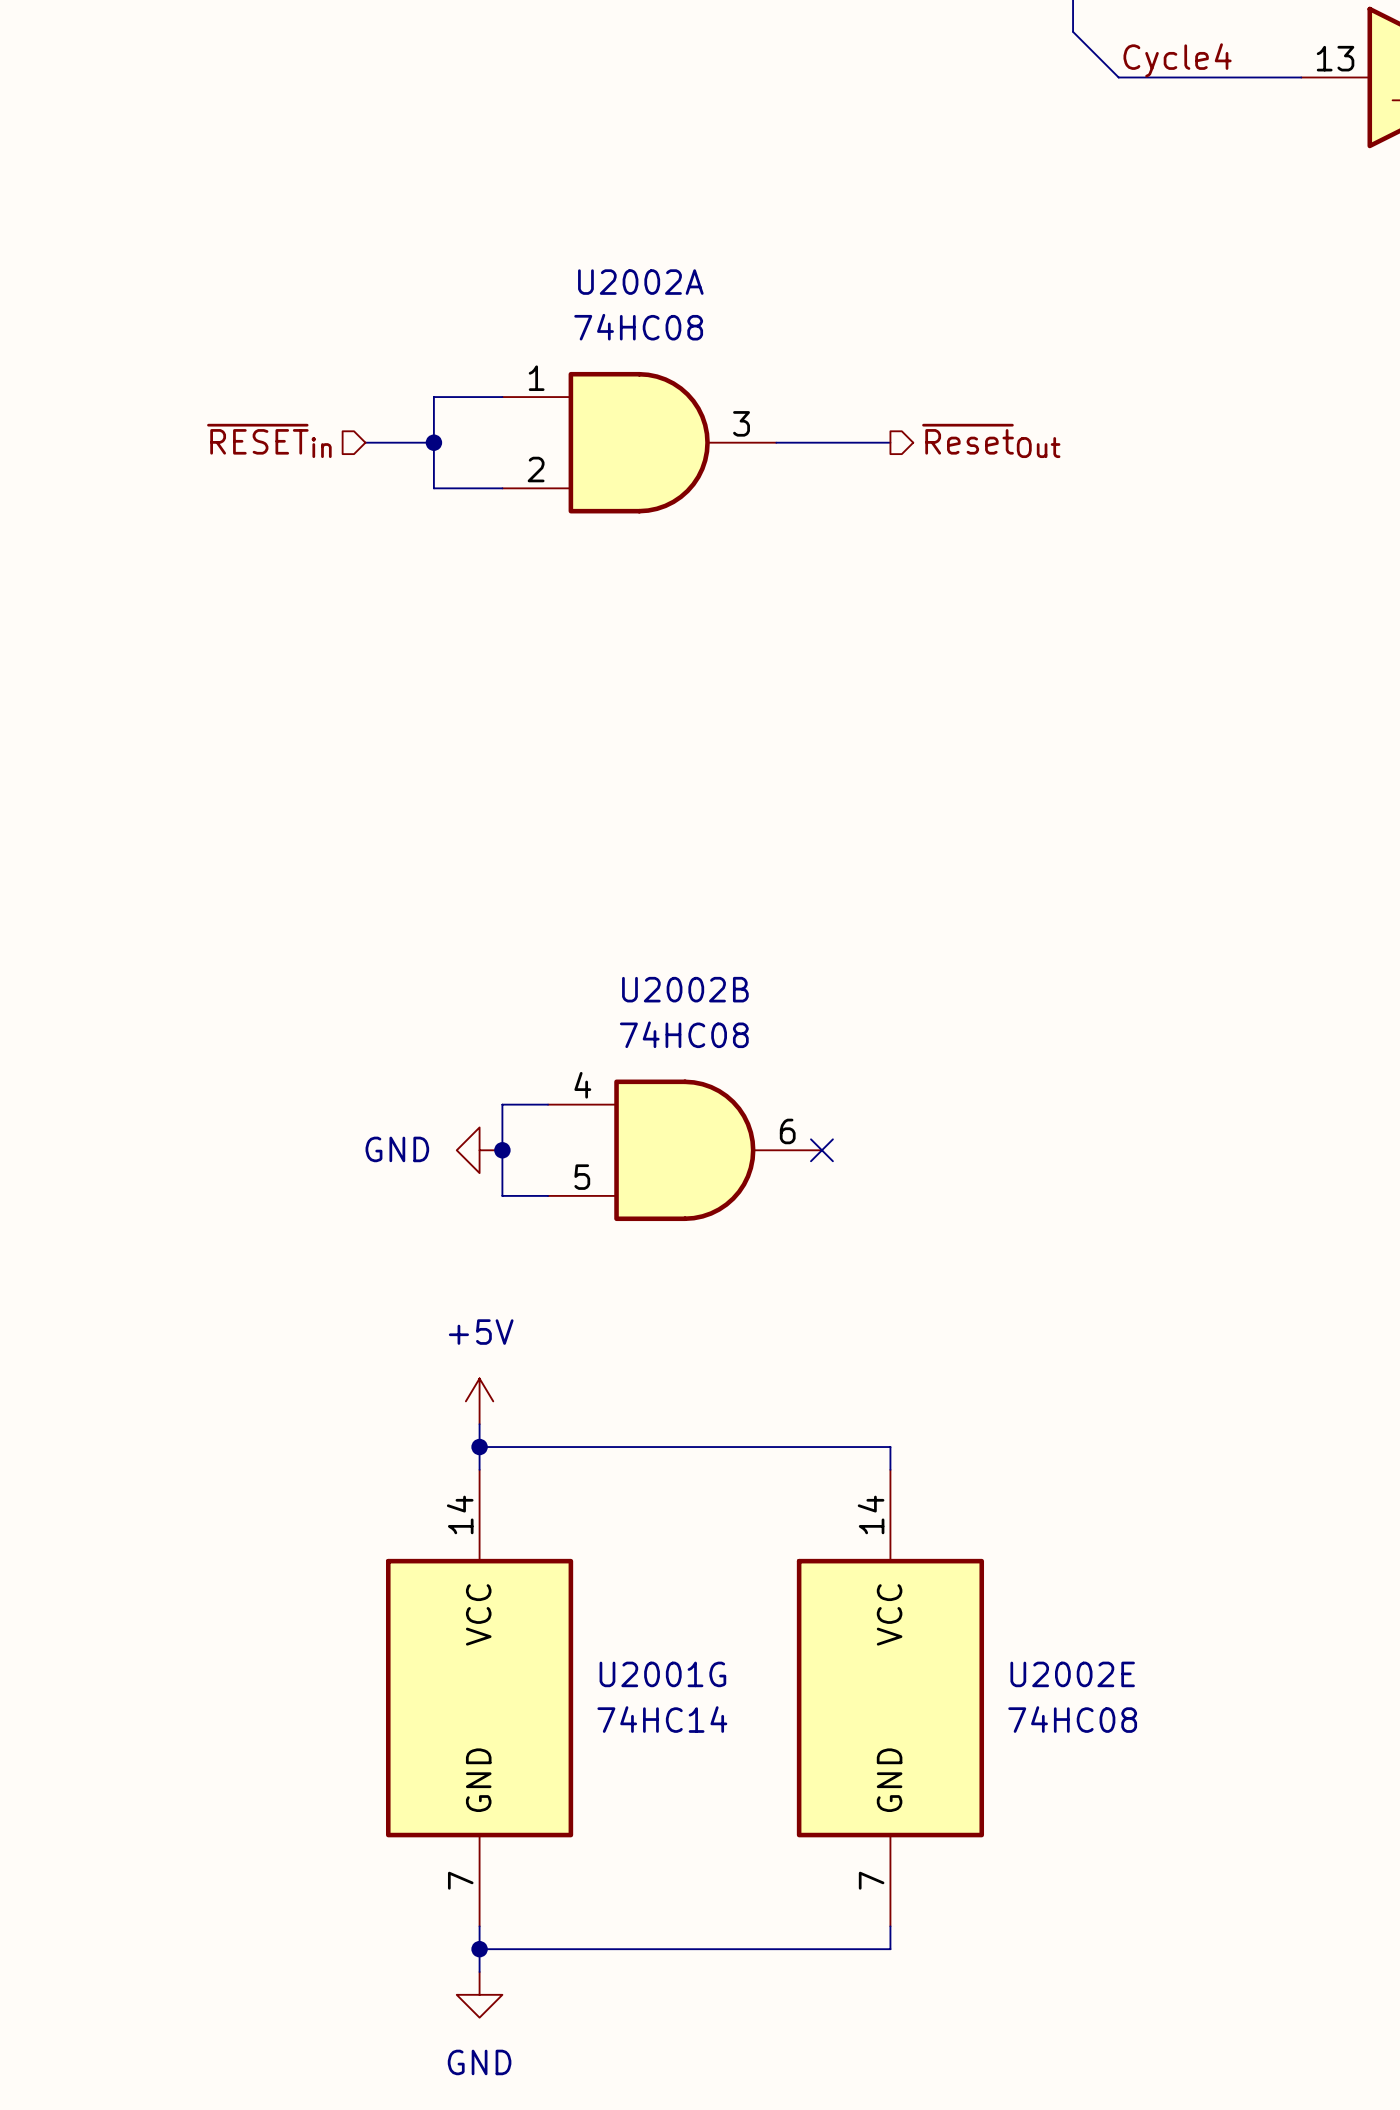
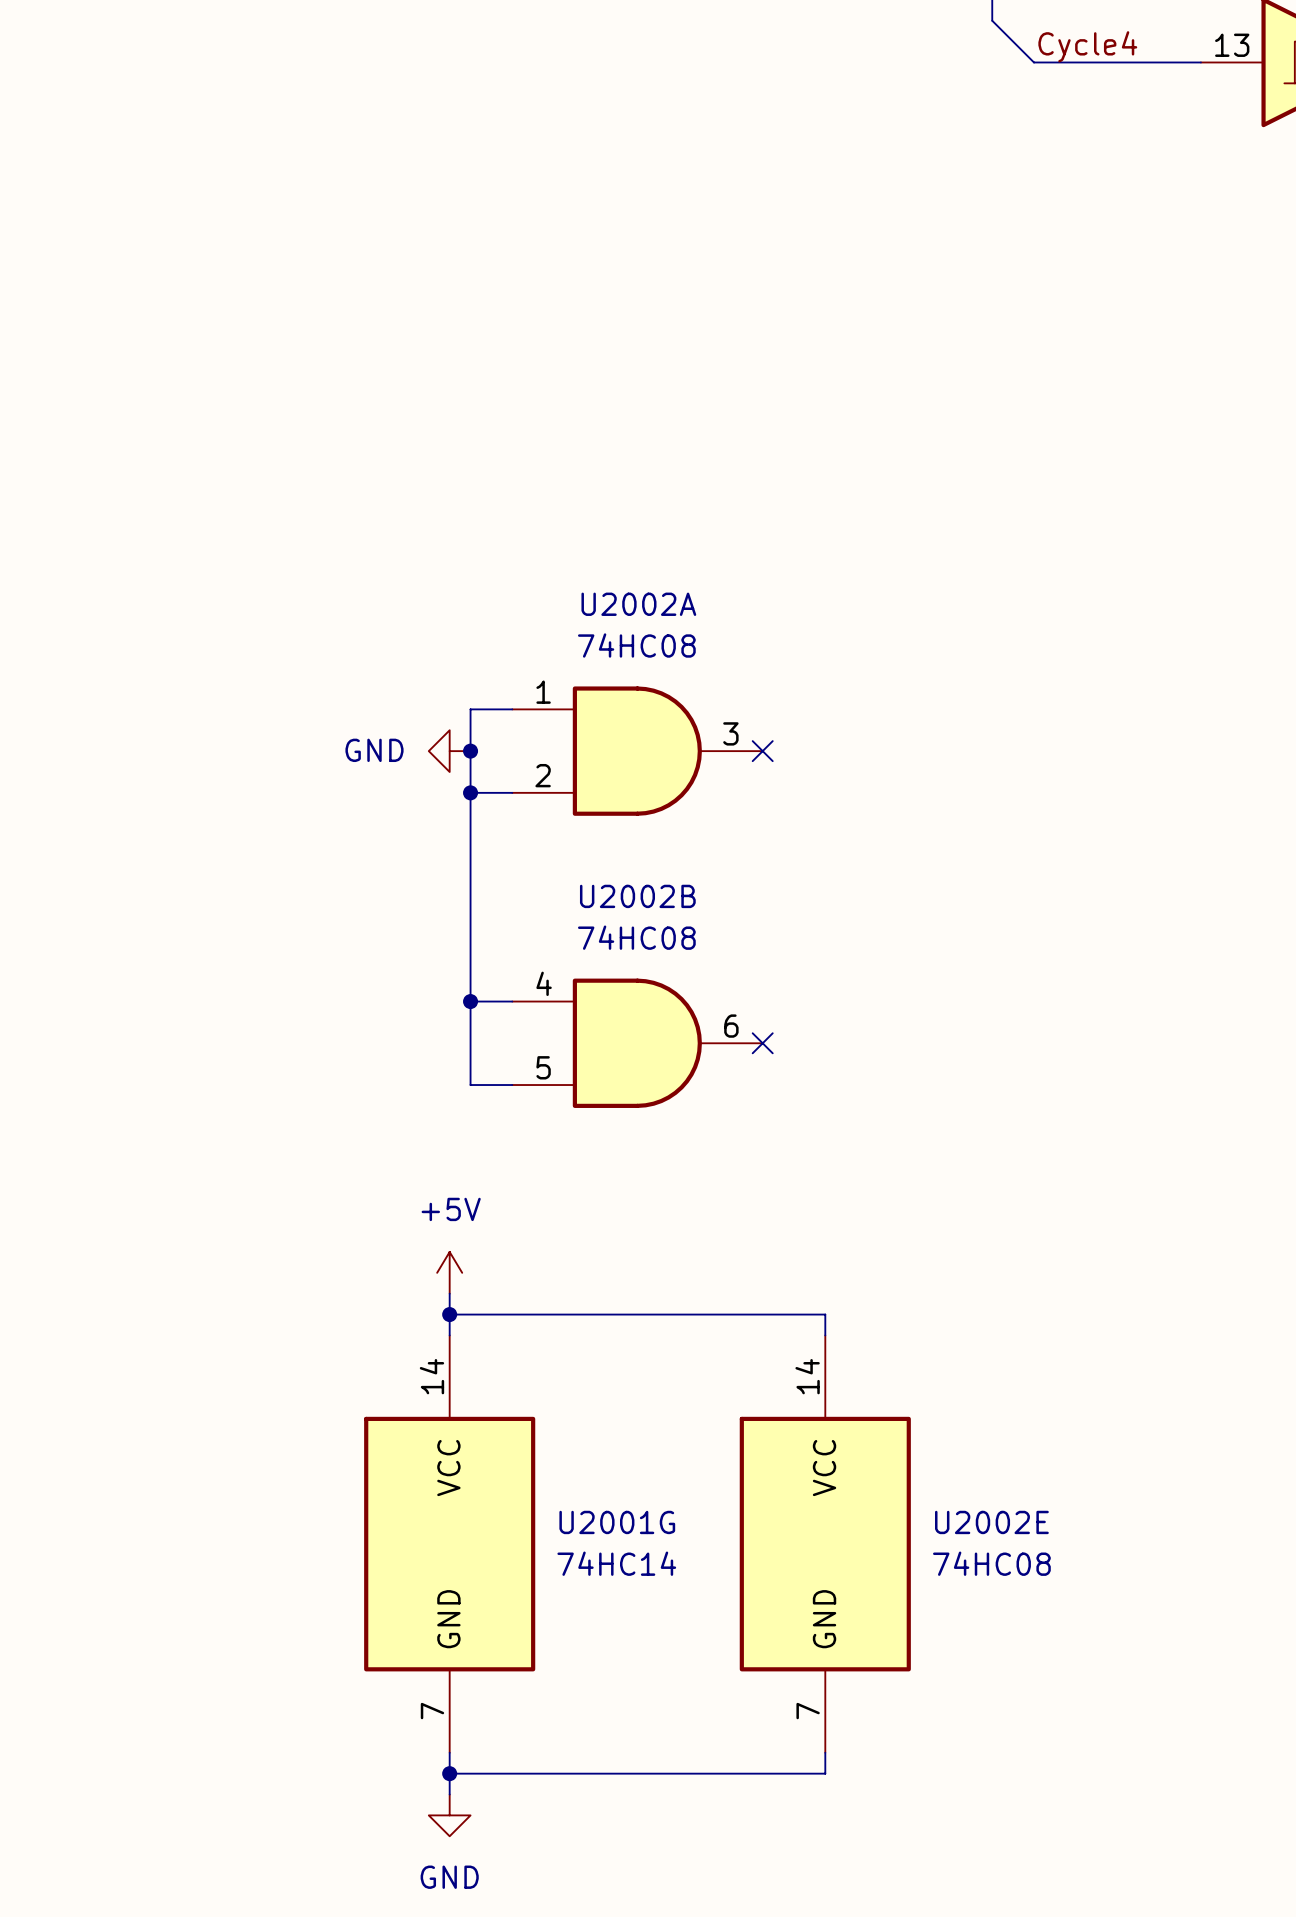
wire: (502, 397) (433, 397) (433, 488) (502, 488) -> none
hierarchical label: ~{RESET}in (269, 440) -> none
hierarchical label: ~{Reset}Out (991, 440) -> none
wire: (365, 442) (433, 442) -> none
junction: (433, 442) -> none
U2002A position: (639, 442) -> (637, 751)
wire: (776, 442) (890, 442) -> none
wire: none -> (512, 709) (470, 709) (470, 1001)
junction: none -> (470, 751)
no-connect mark: none -> (762, 751)
wire: none -> (470, 792) (512, 792)
junction: none -> (470, 792)
power symbol position: GND (479, 1150) -> GND (449, 751)
junction position: (502, 1150) -> (470, 1001)

